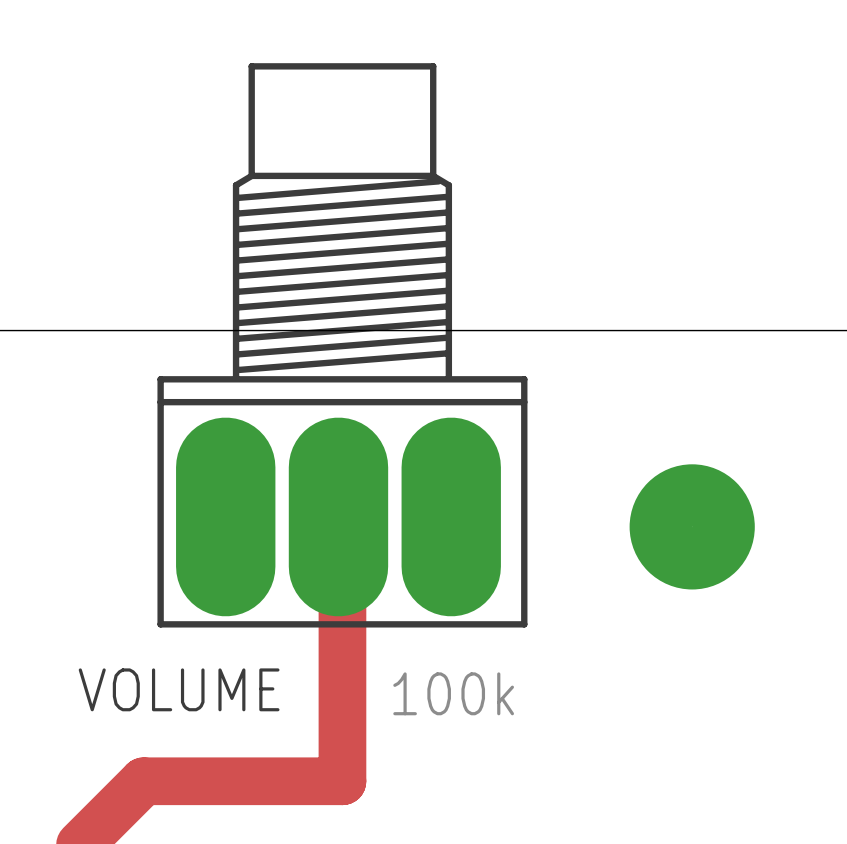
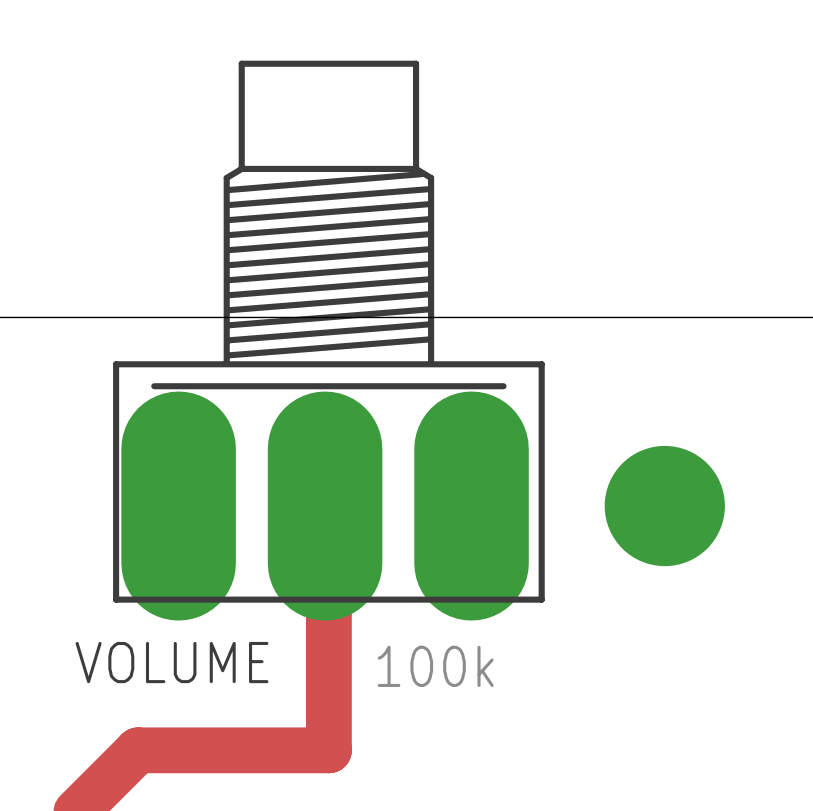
VOLUME footprint: [157, 63, 528, 628] -> [113, 60, 545, 621]

